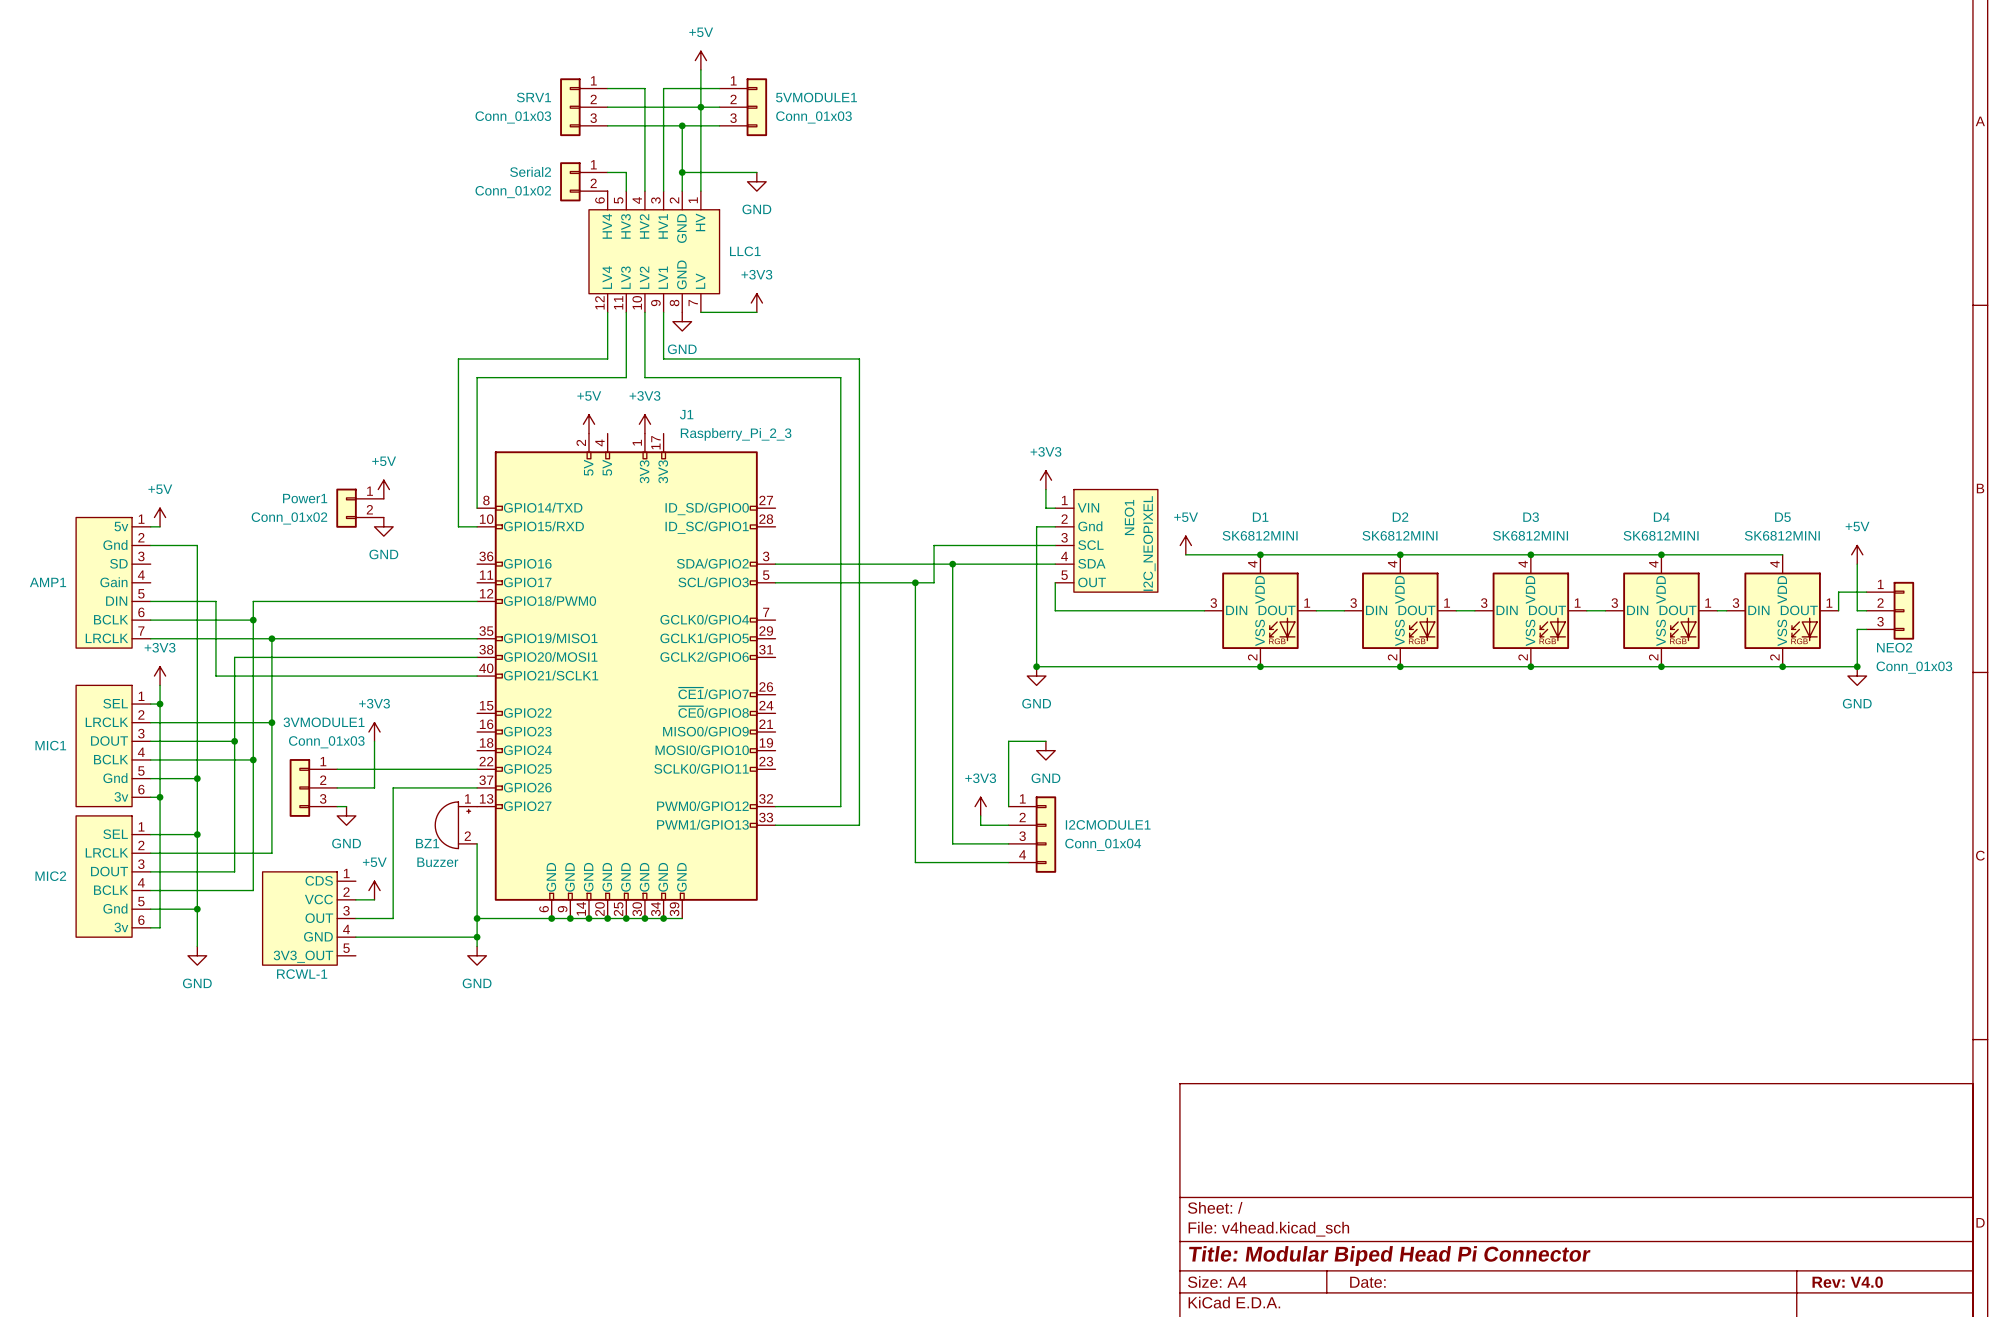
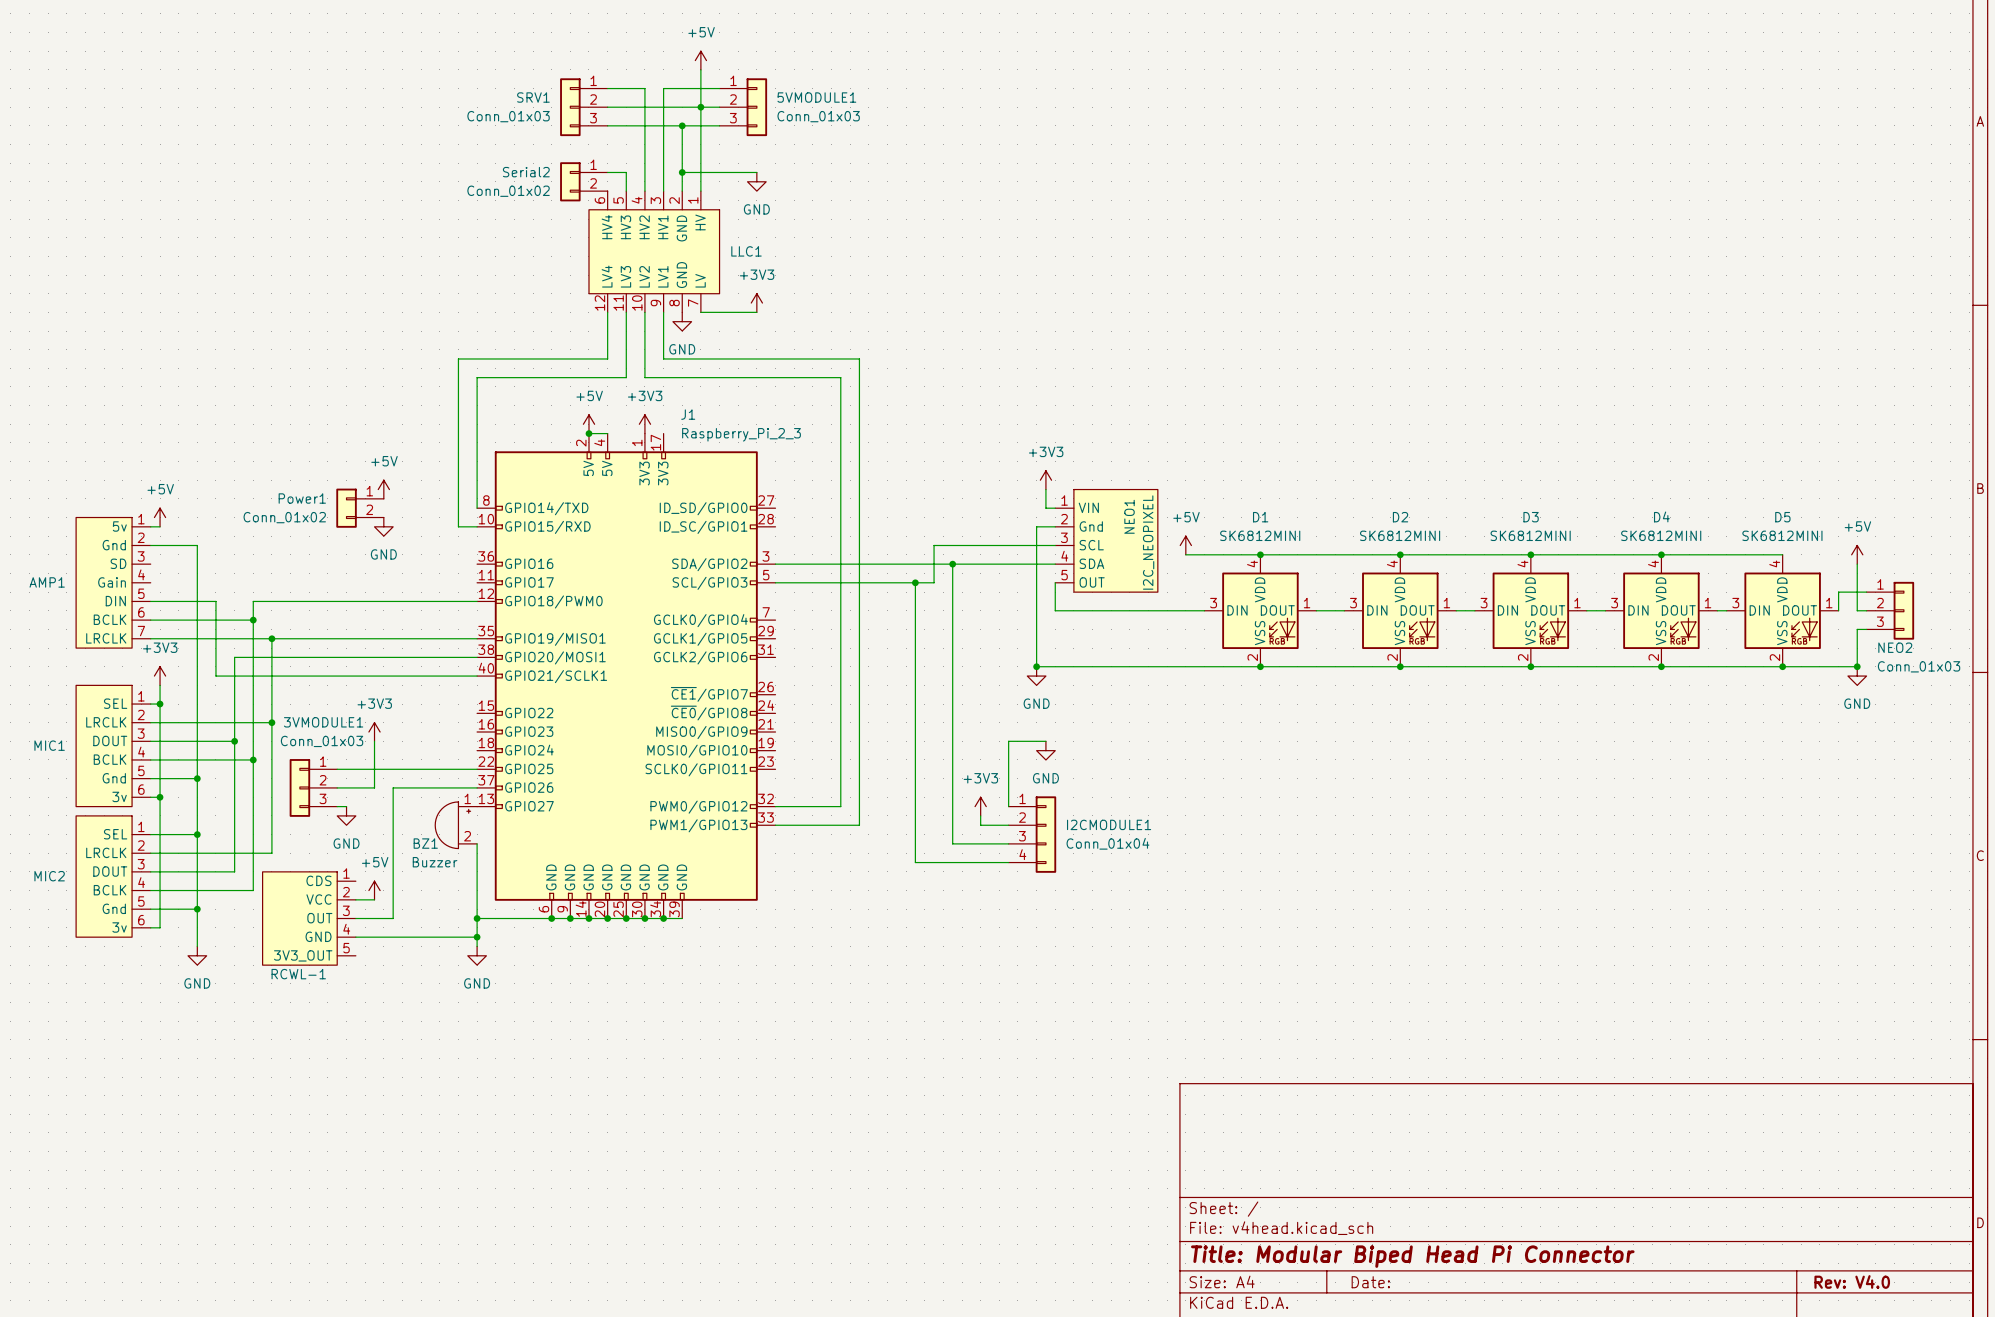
wire: none -> (588, 433) (607, 433)
junction: none -> (588, 433)

